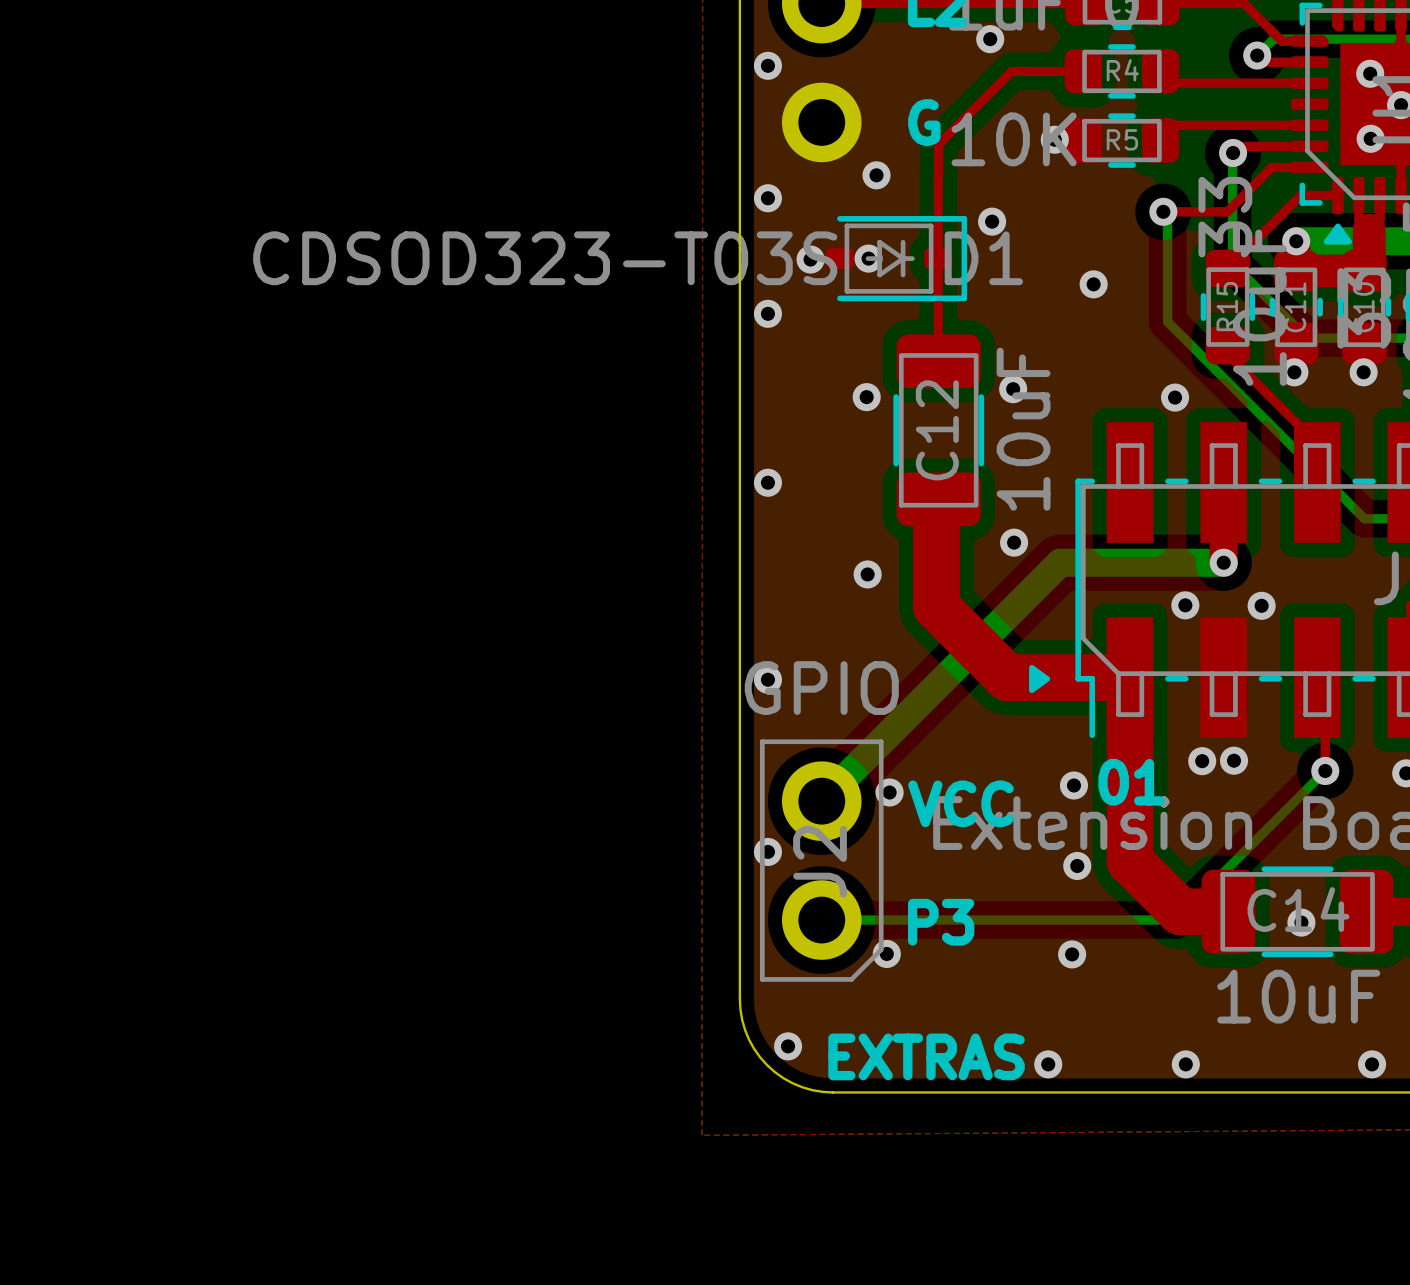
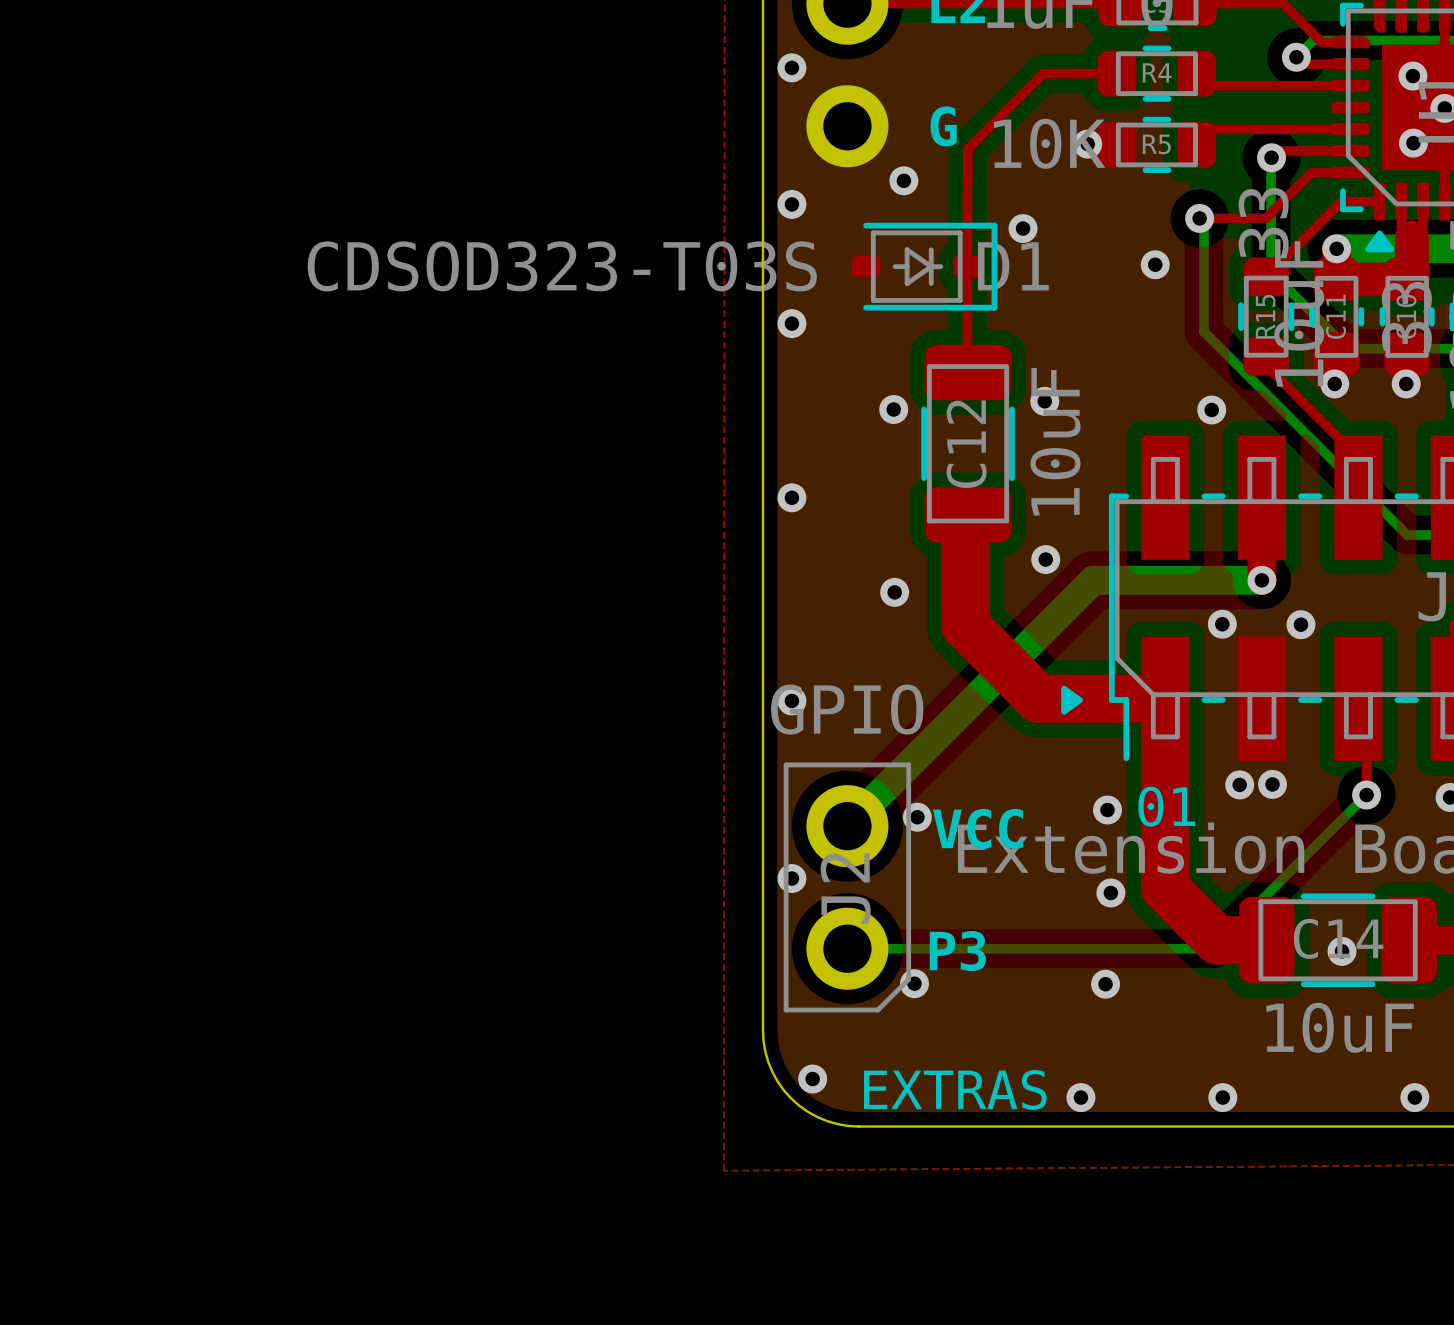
via: (990, 39) -> none
via: (868, 258) -> none
via: (810, 259) -> none
via position: (1093, 284) -> (1155, 264)

